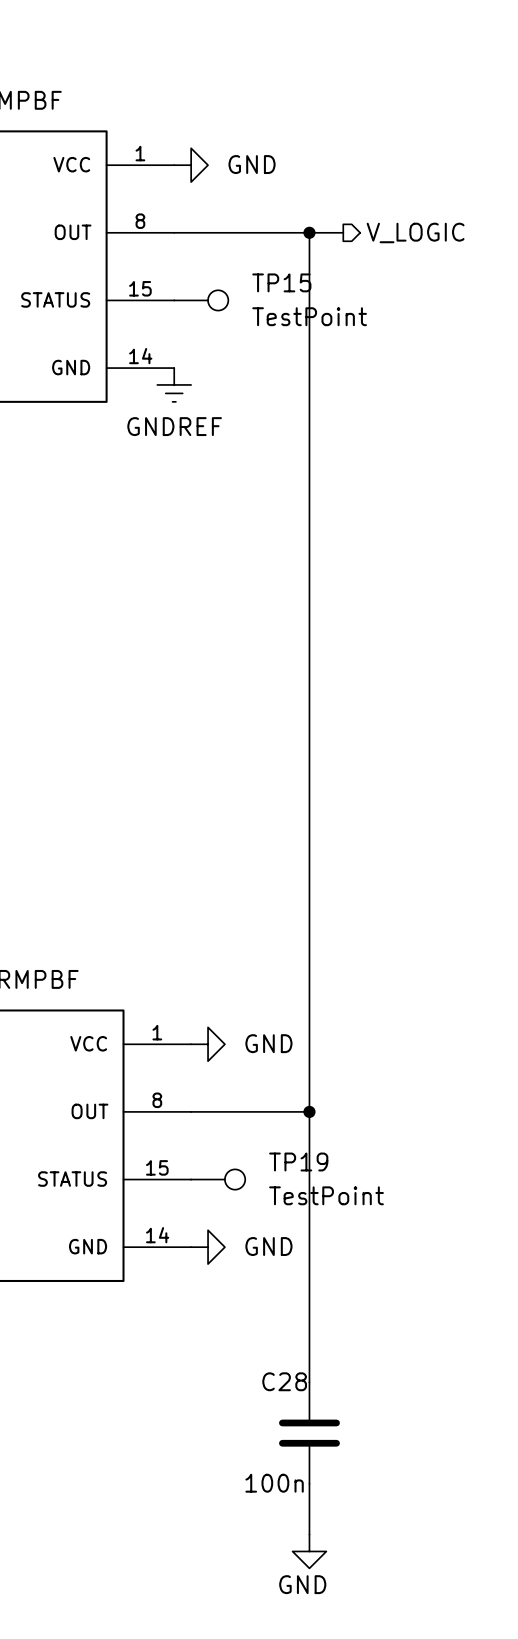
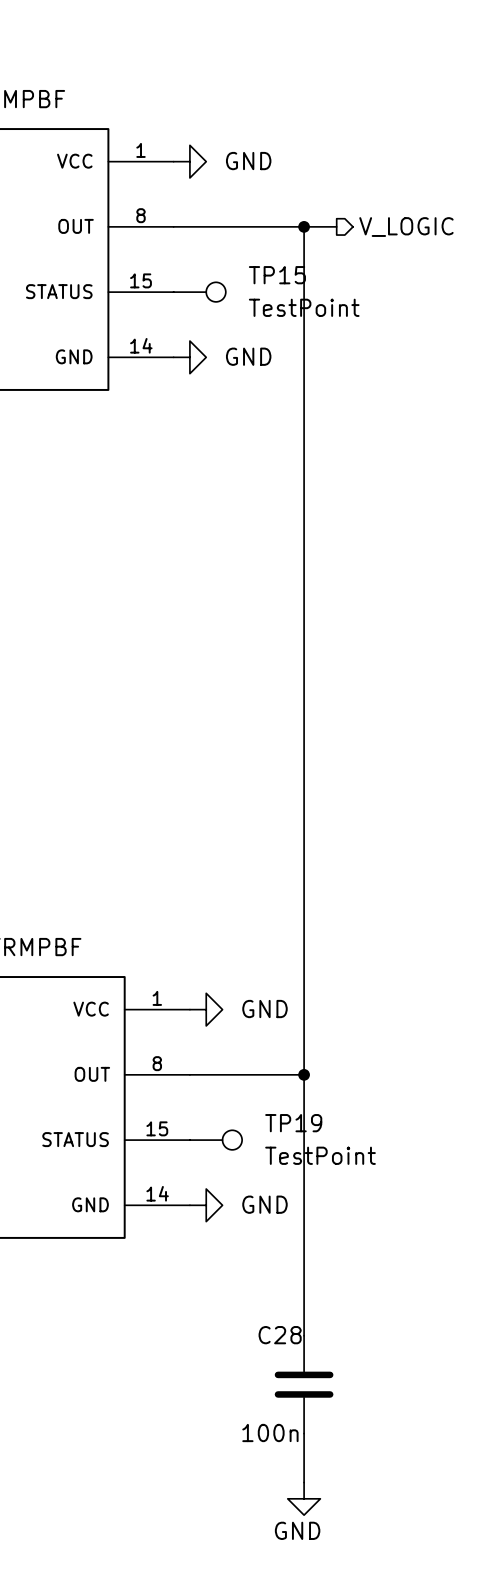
power symbol: none -> GND (189, 357)
power symbol: GNDREF (174, 384) -> none

